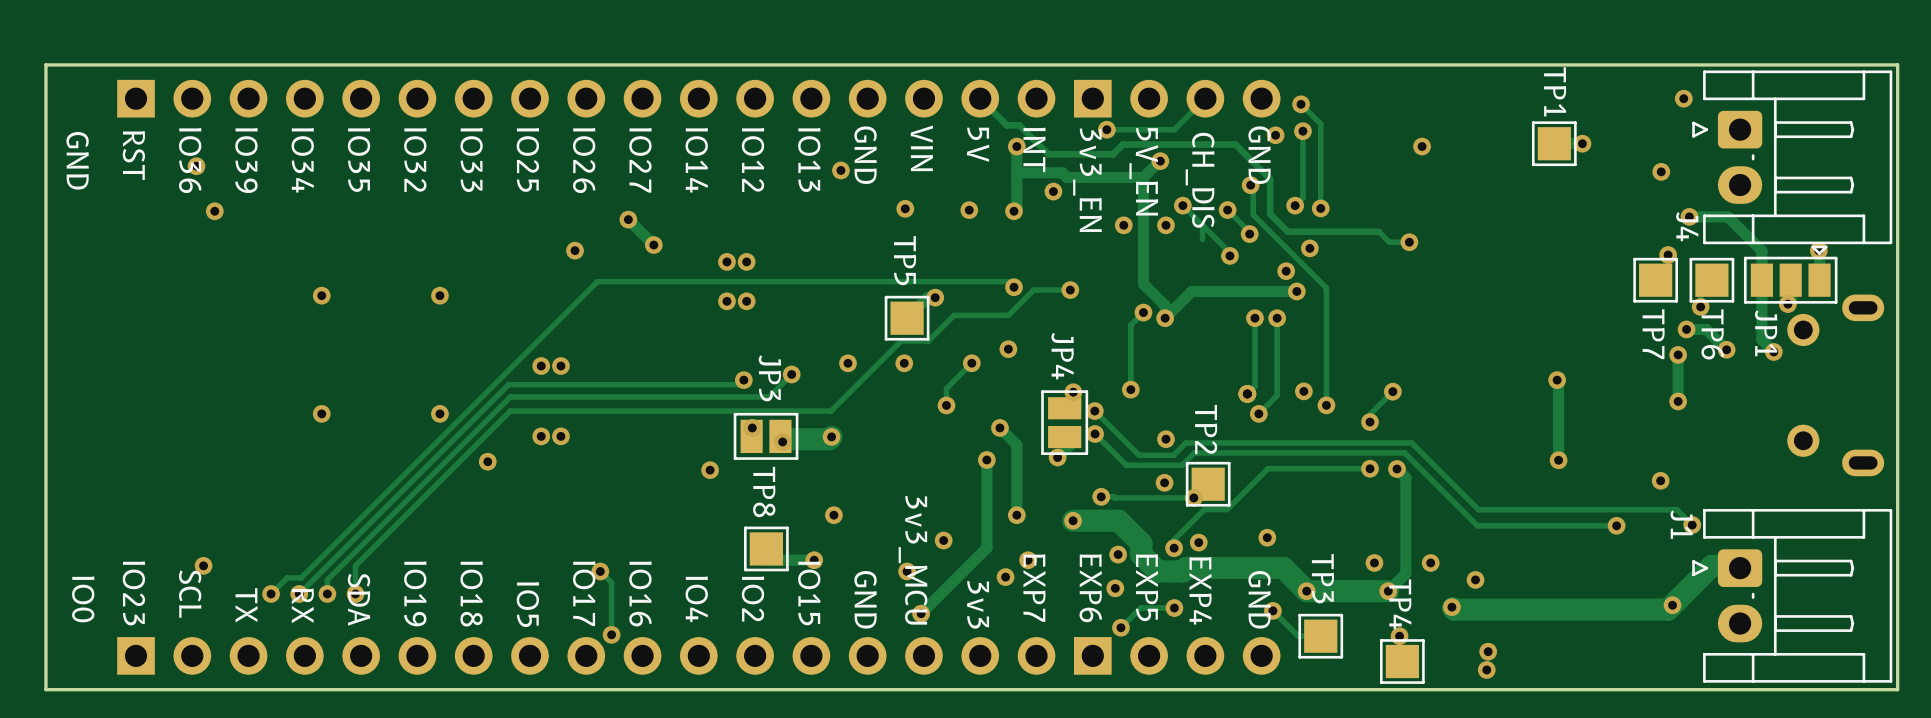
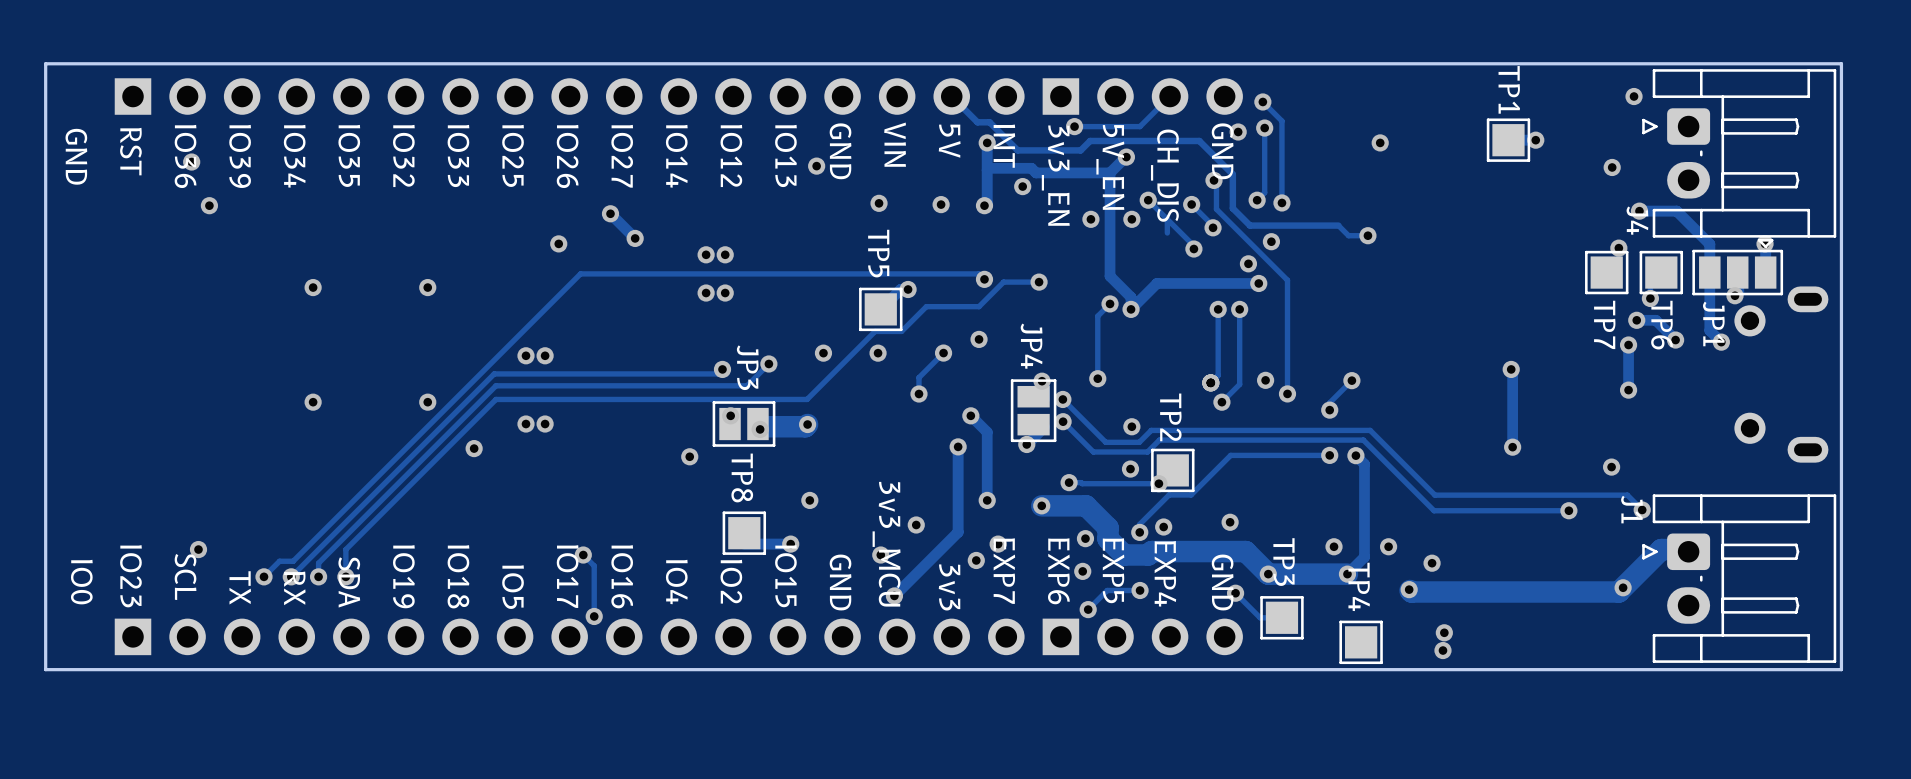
via: (1399, 636) -> none

